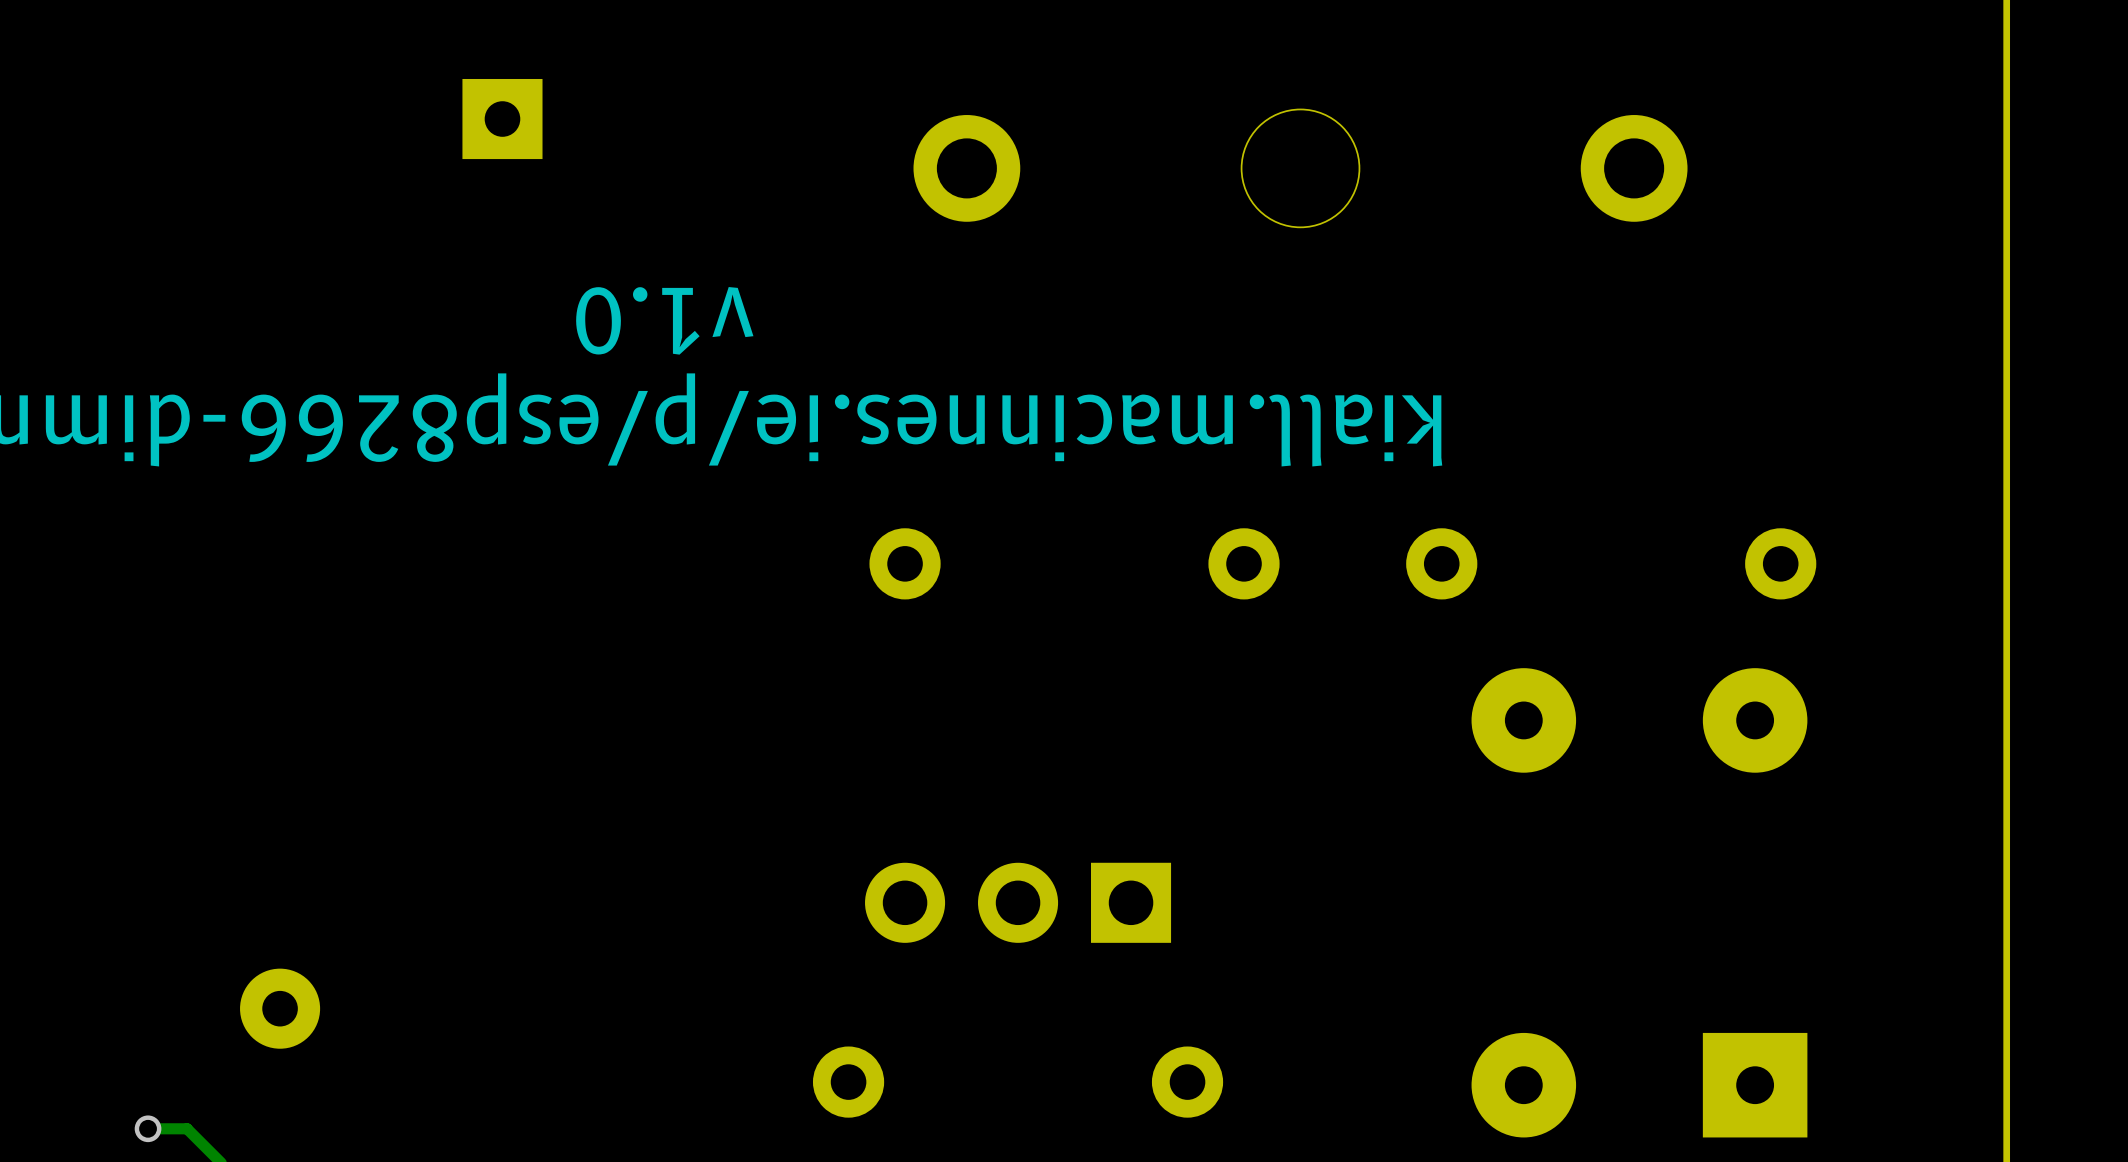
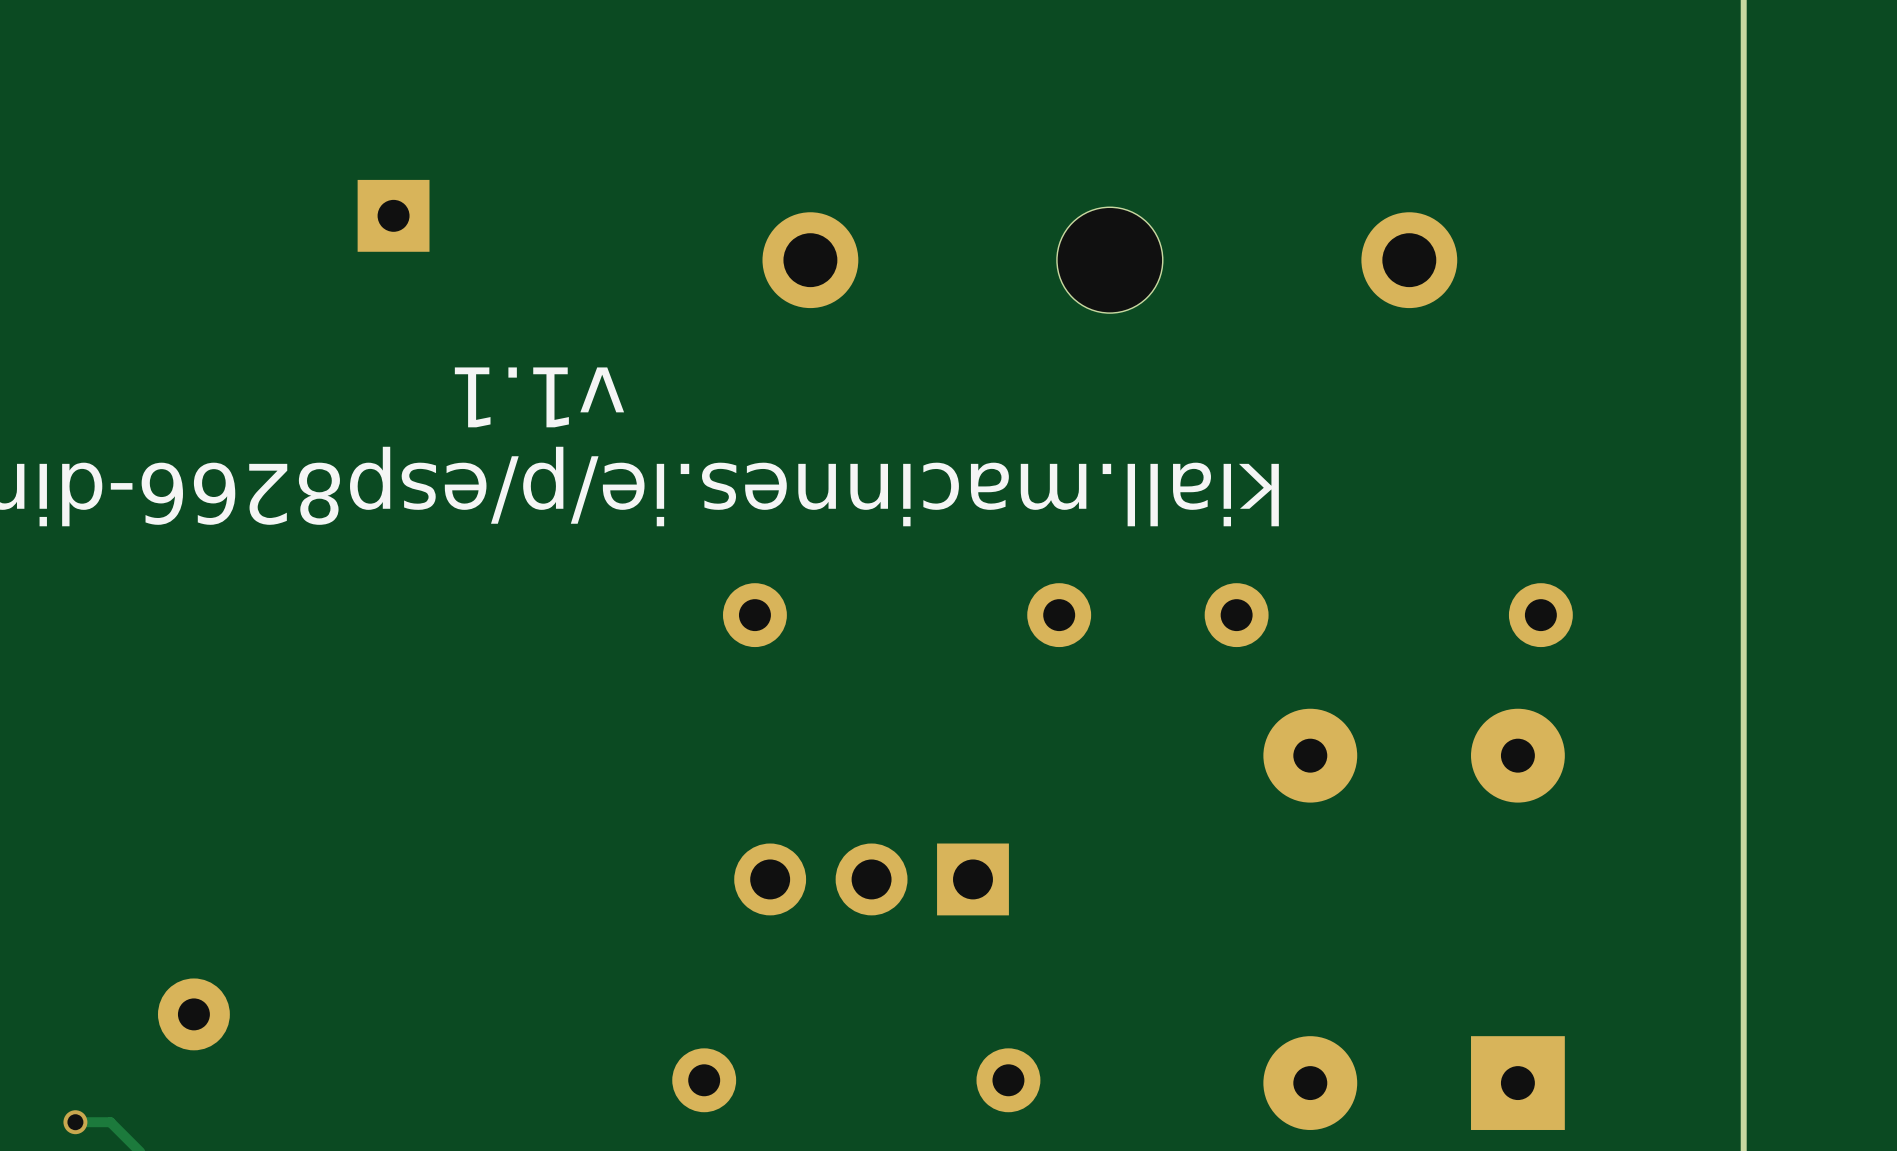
text: v1.0 (664, 320) -> v1.1 (539, 397)
part position: (1018, 902) -> (871, 879)

